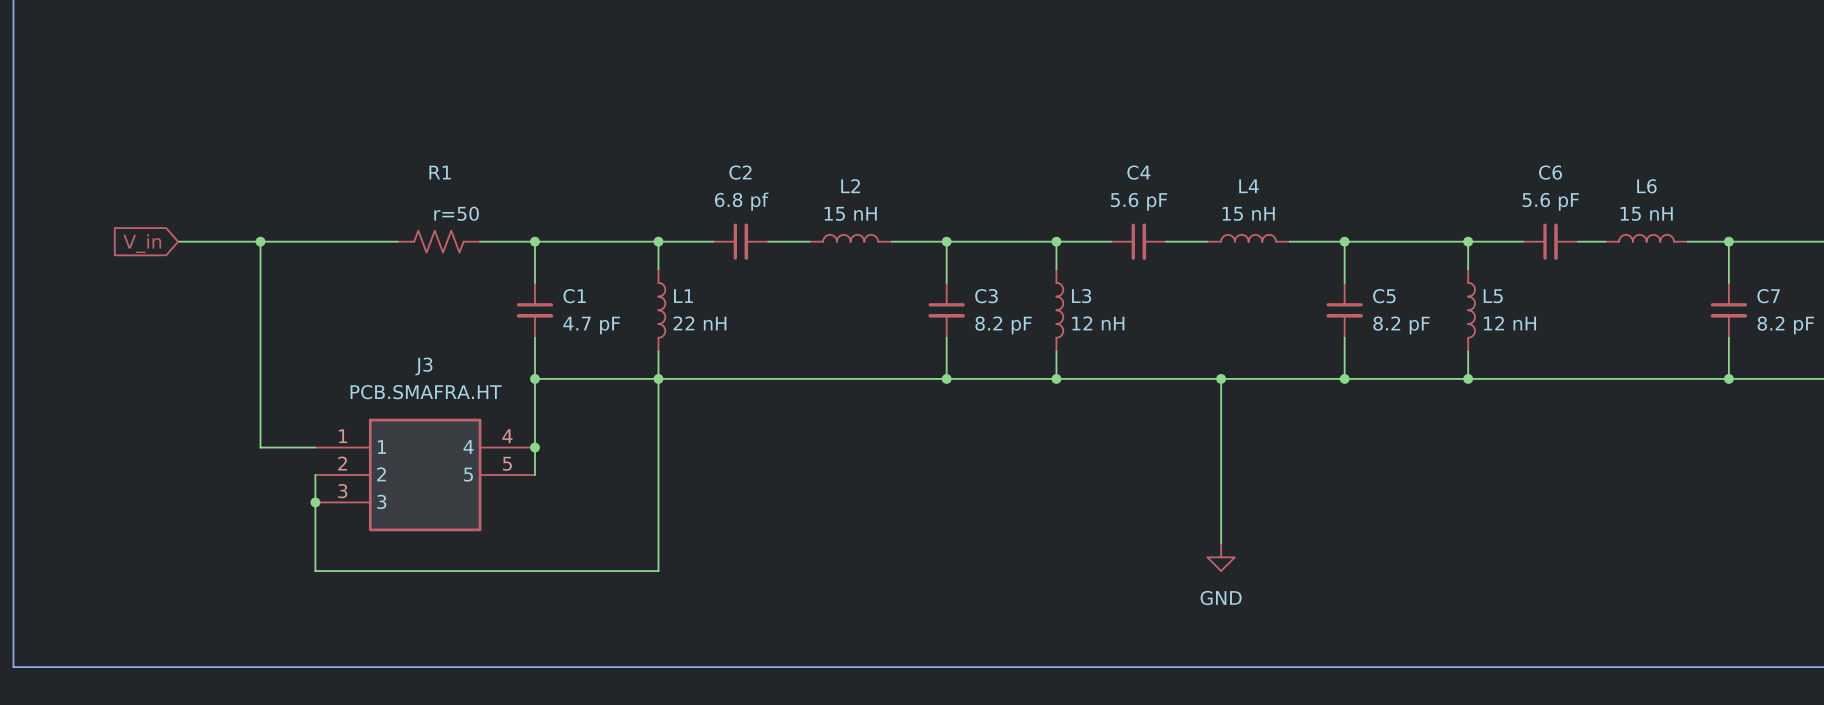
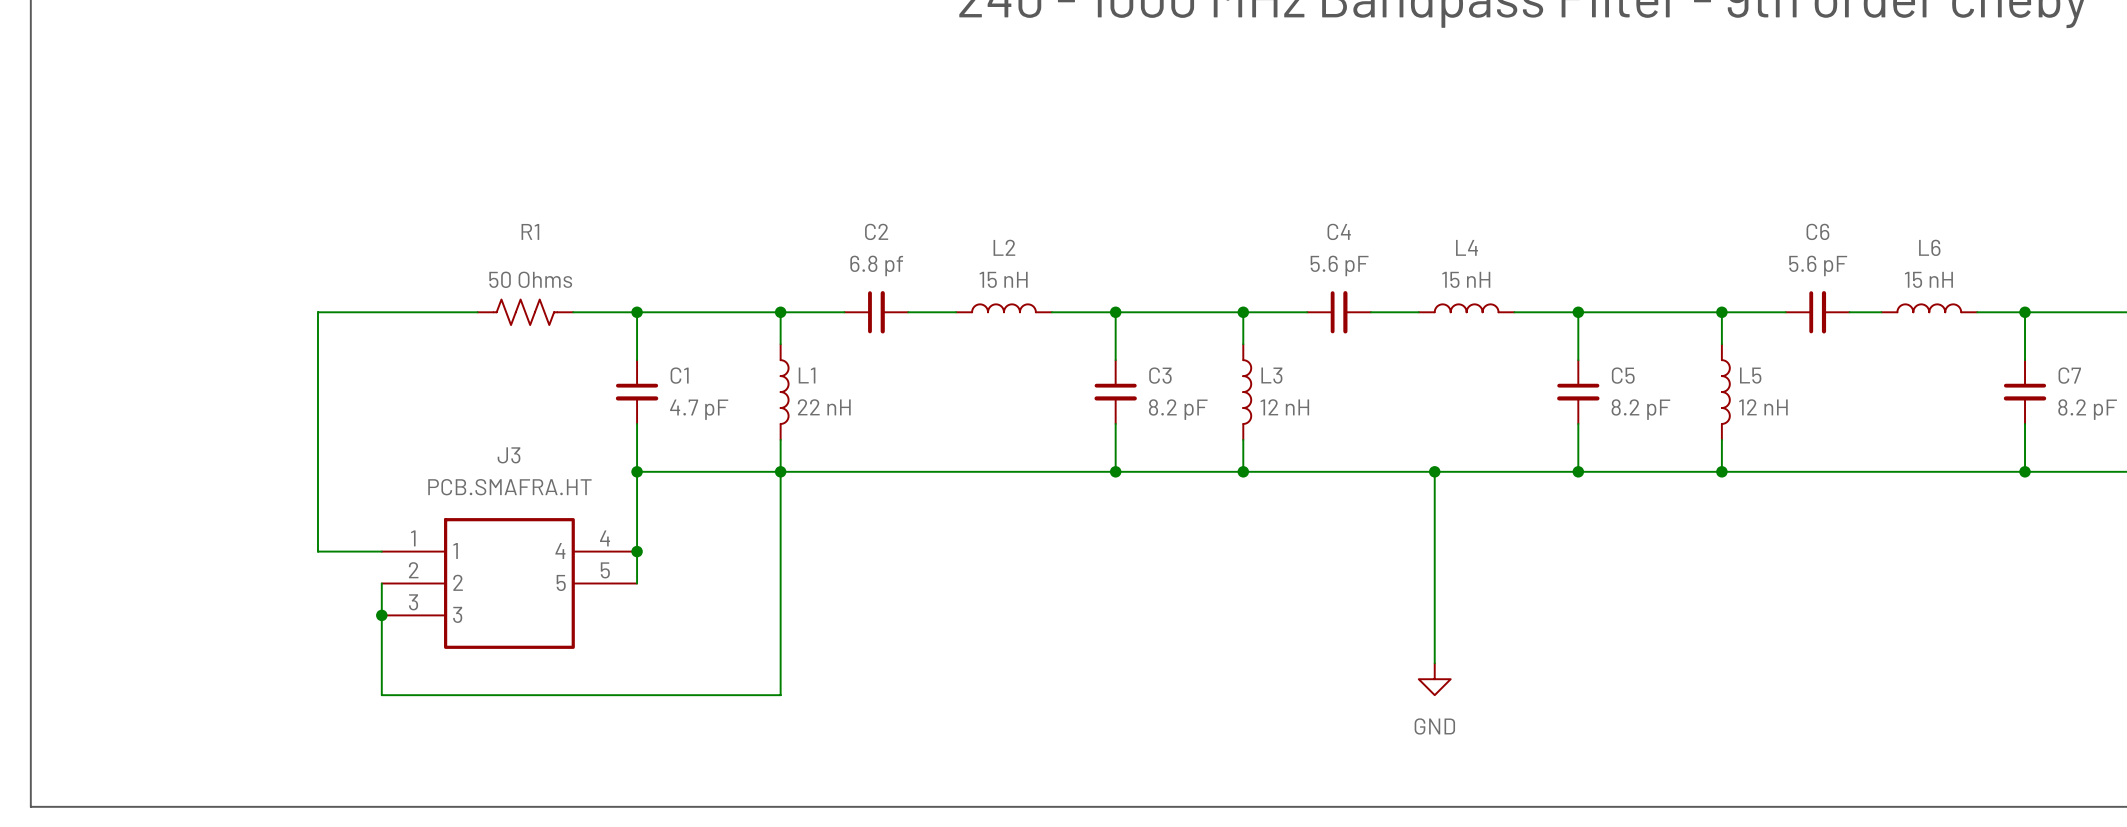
R1 value: r=50 (456, 213) -> 50 Ohms (530, 279)
wire: (178, 241) (260, 241) -> none
junction: (260, 241) -> none
global label: V_in (142, 243) -> none

